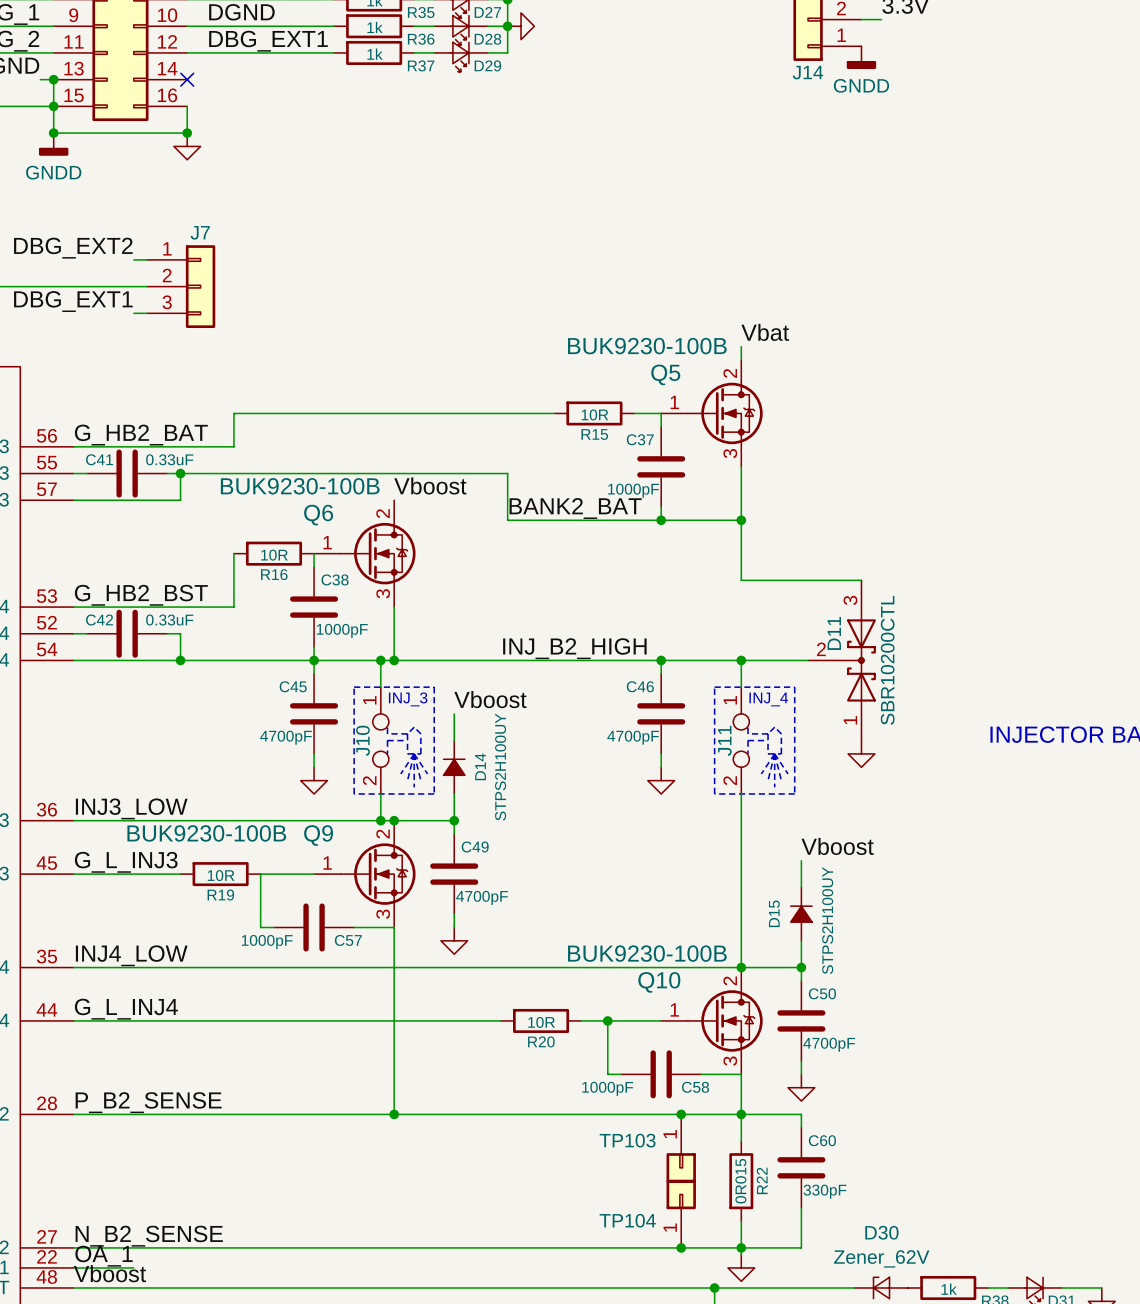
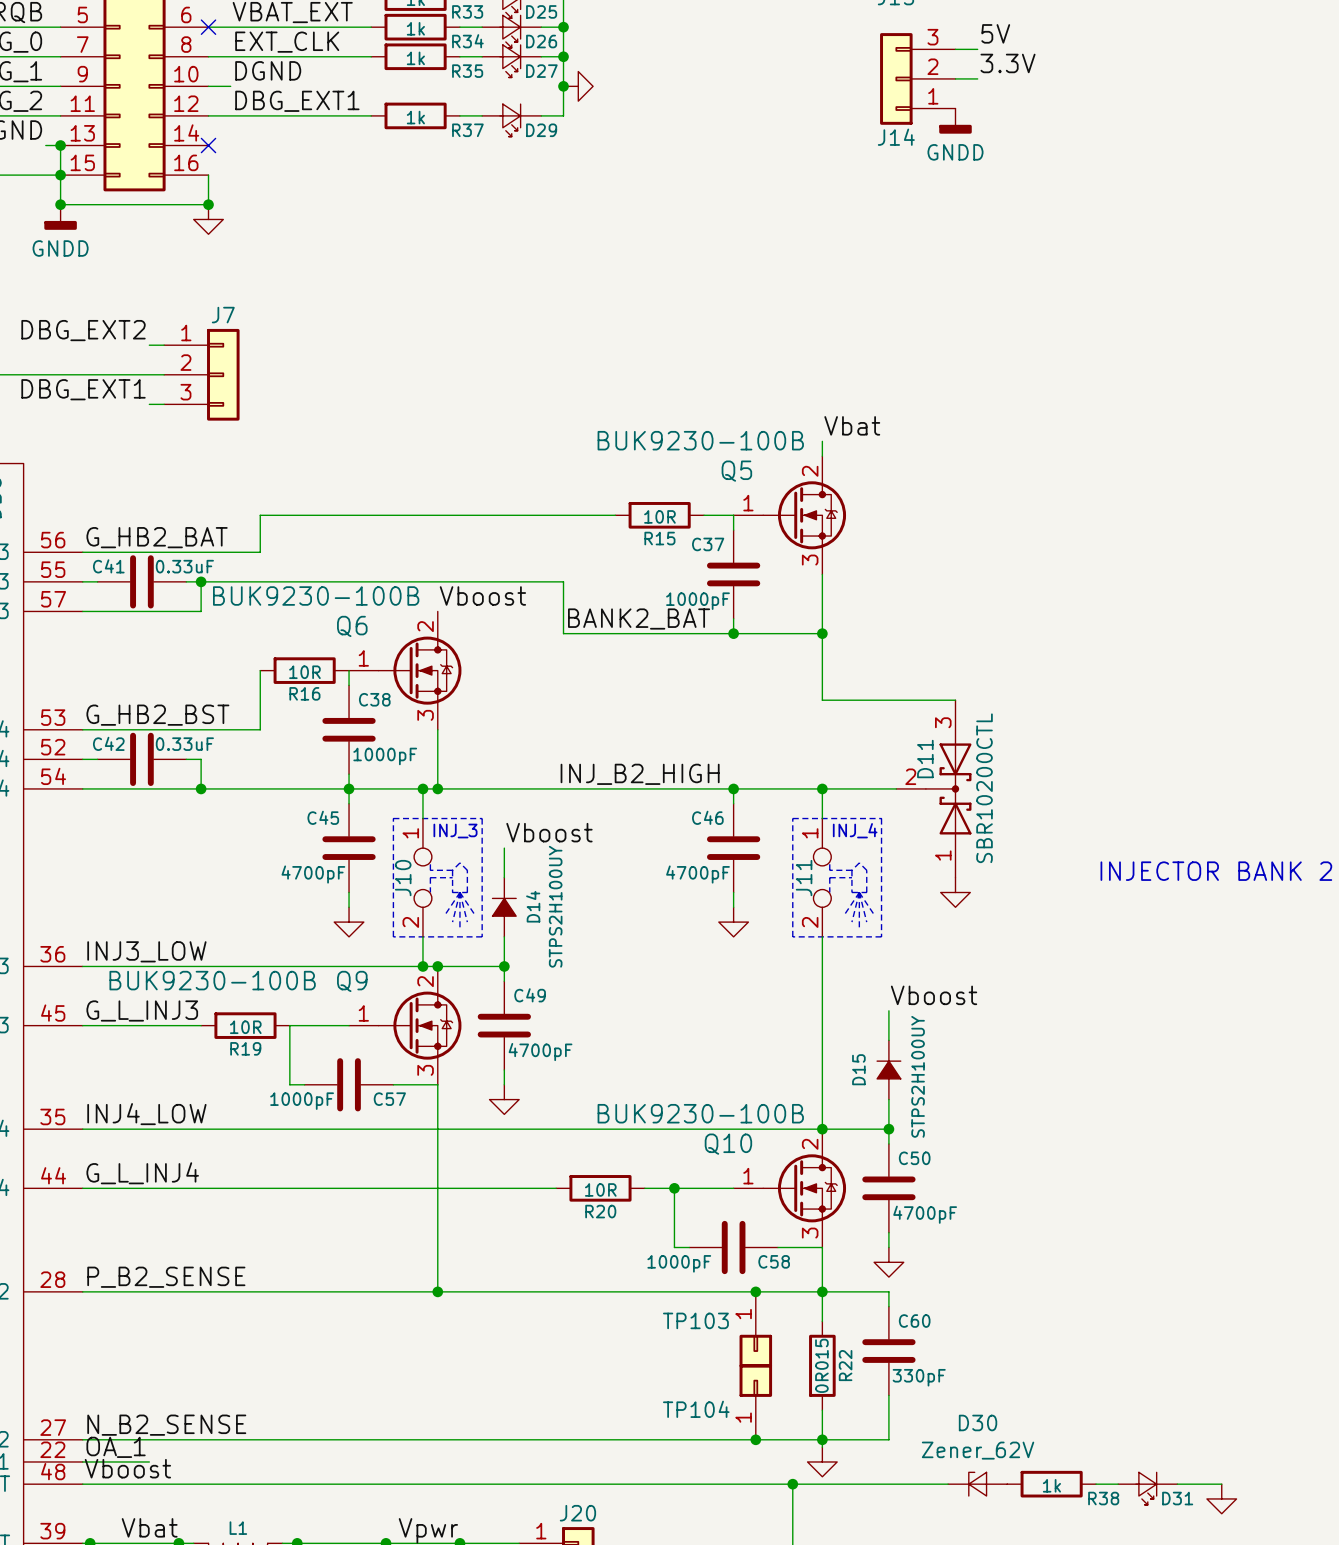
wire: (207, 26) (334, 26) -> none
R36: 1k (374, 26) -> none
wire: (414, 26) (434, 26) -> none
wire: (487, 26) (507, 26) -> none
D28: (460, 30) -> none

